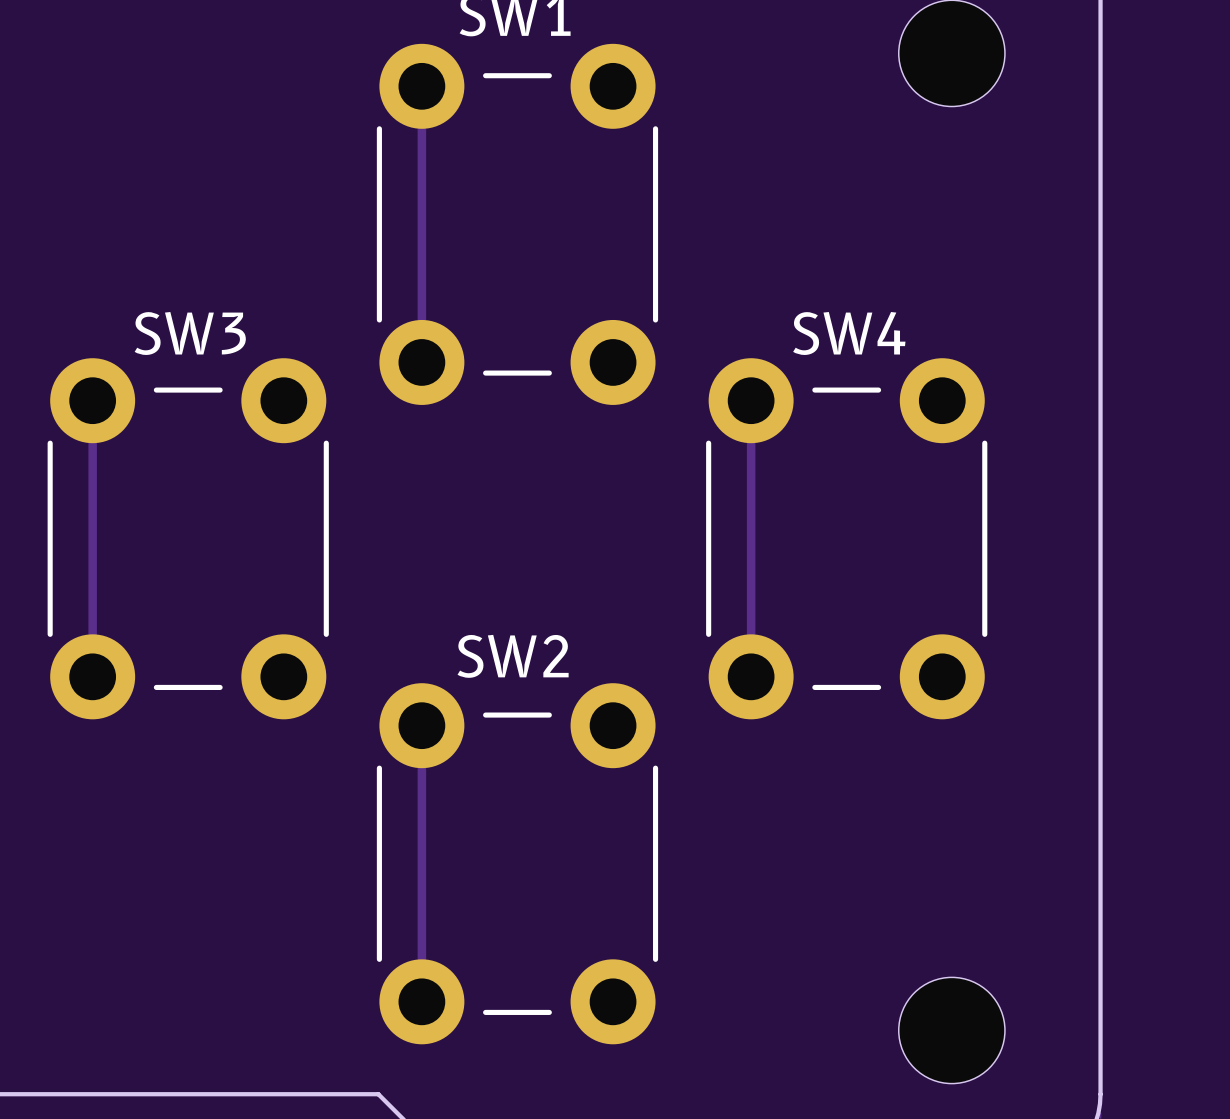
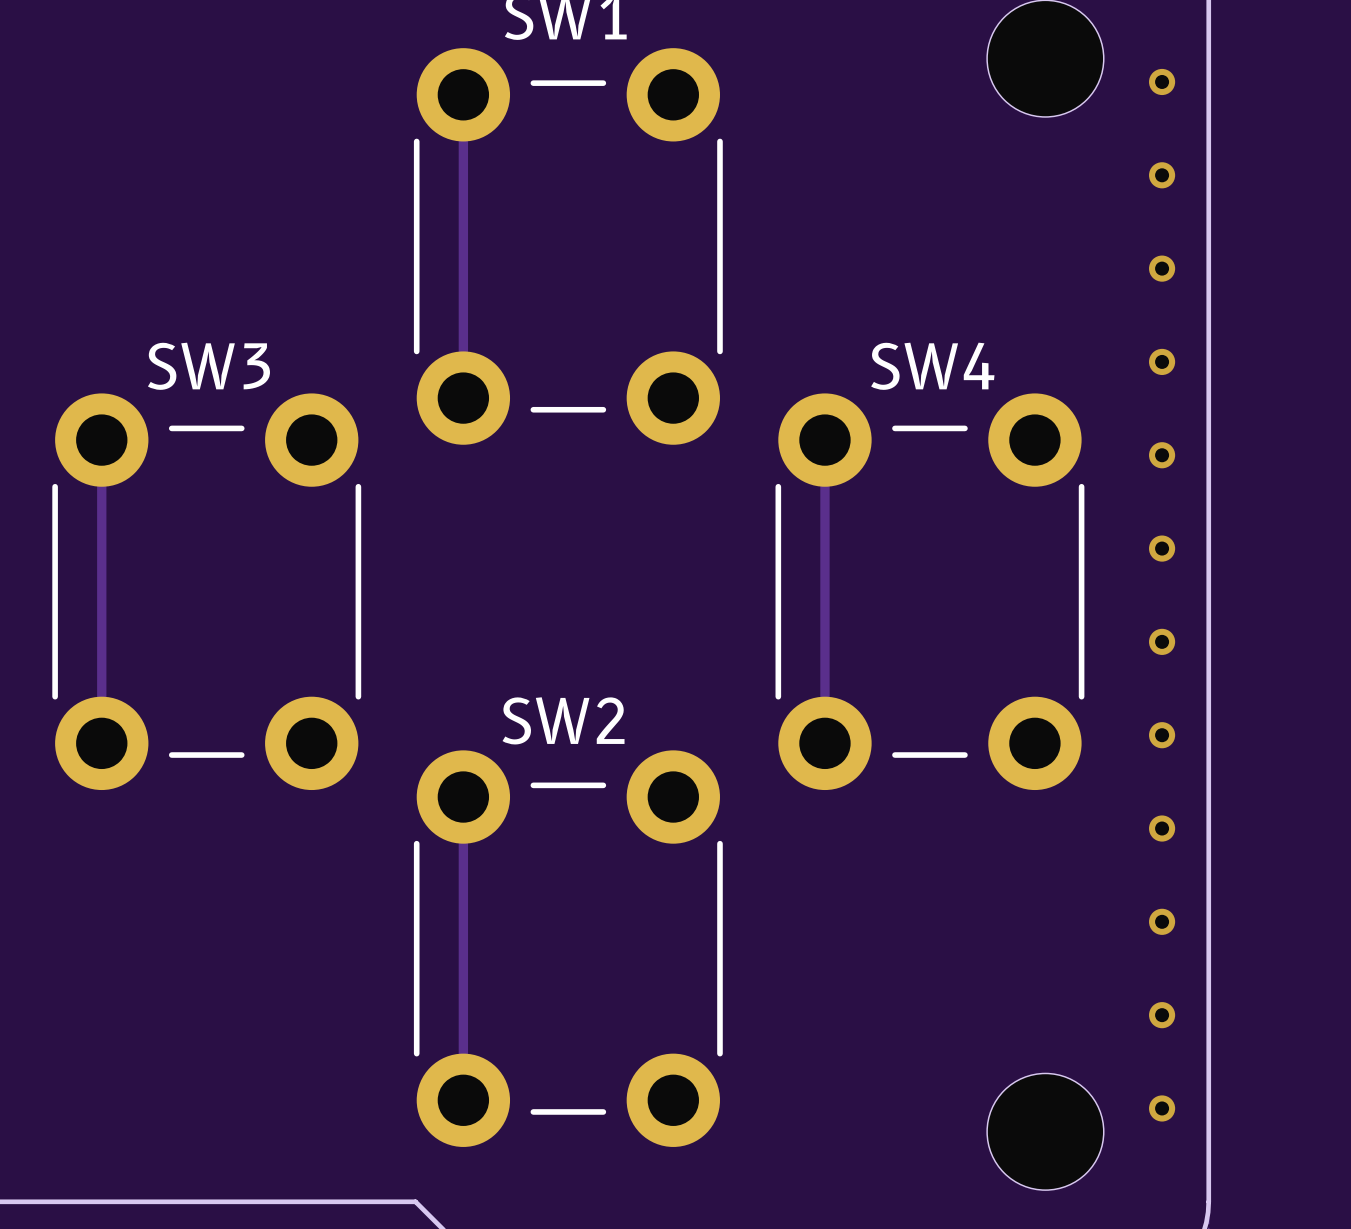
via: none -> (1162, 81)
via: none -> (1162, 175)
via: none -> (1162, 268)
via: none -> (1162, 361)
via: none -> (1162, 455)
via: none -> (1162, 548)
via: none -> (1162, 641)
via: none -> (1162, 735)
via: none -> (1162, 828)
via: none -> (1162, 921)
via: none -> (1162, 1015)
via: none -> (1162, 1108)

